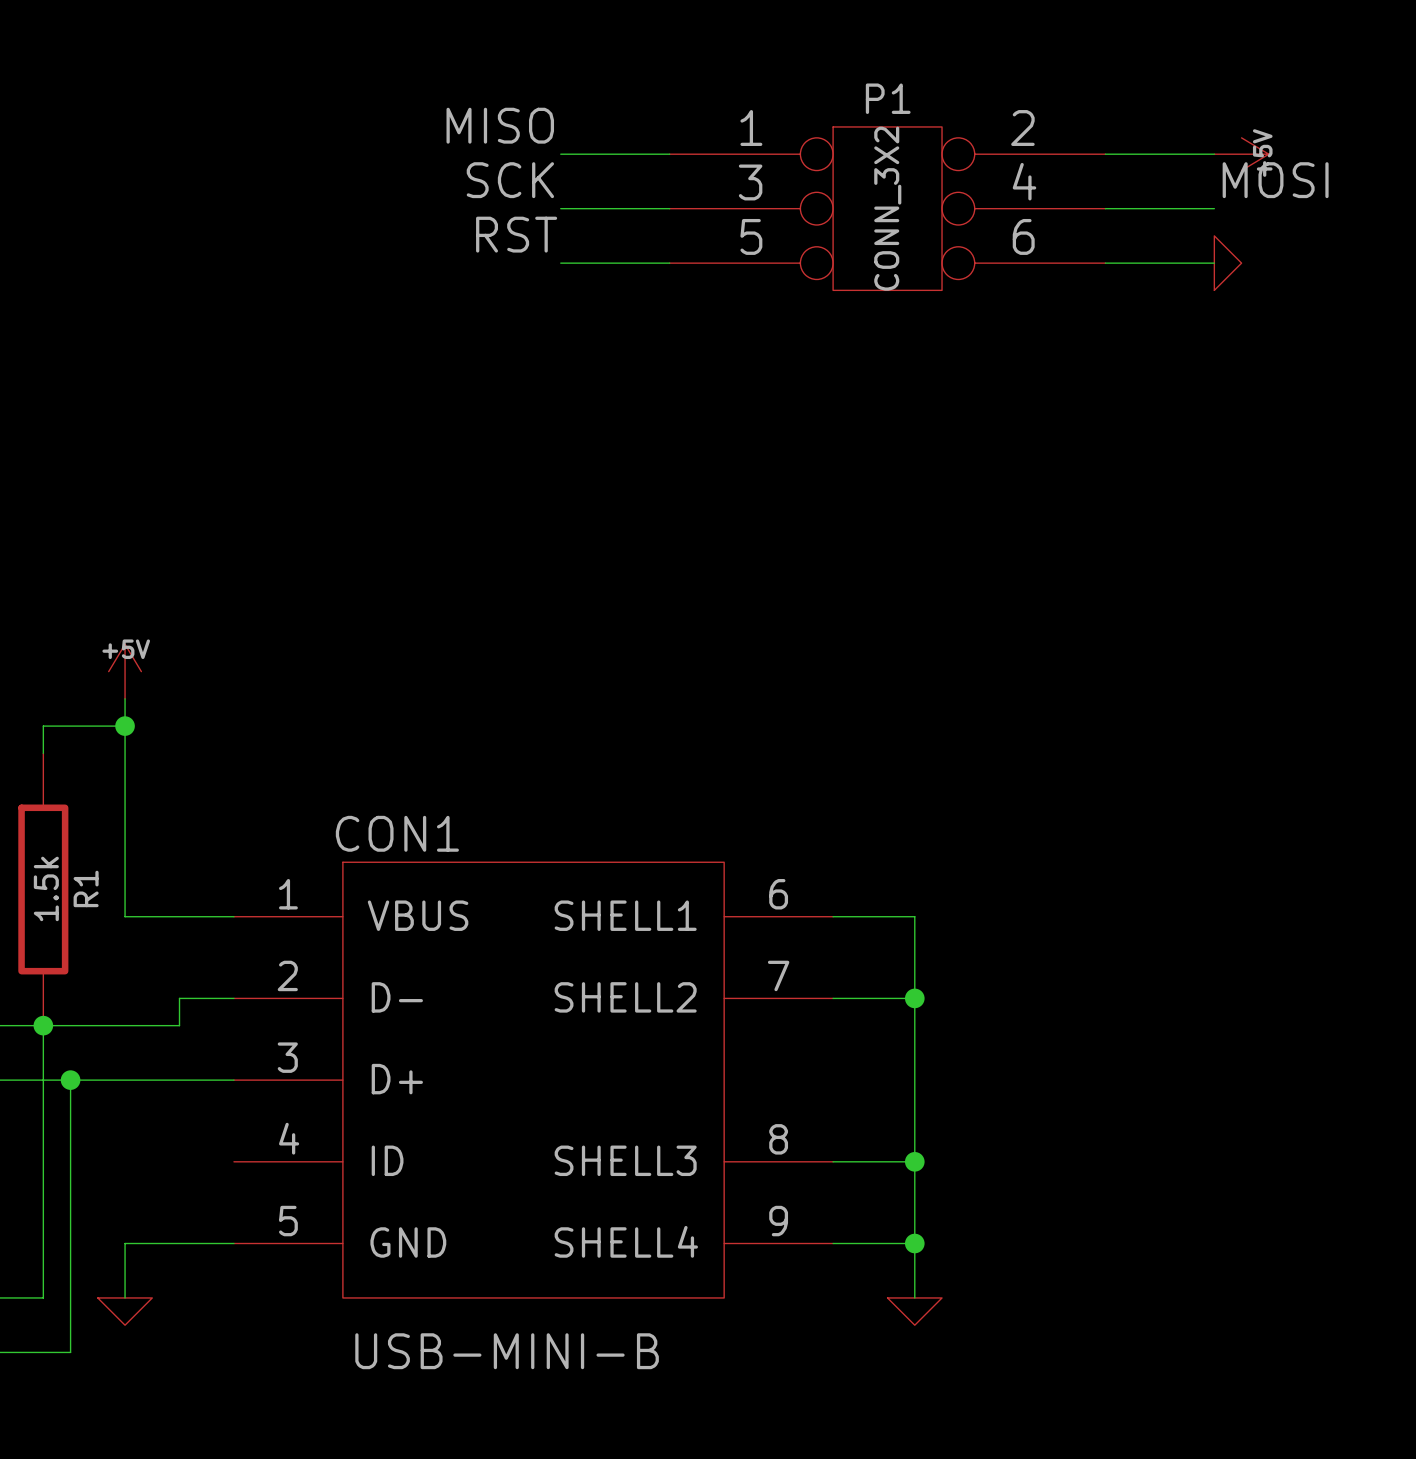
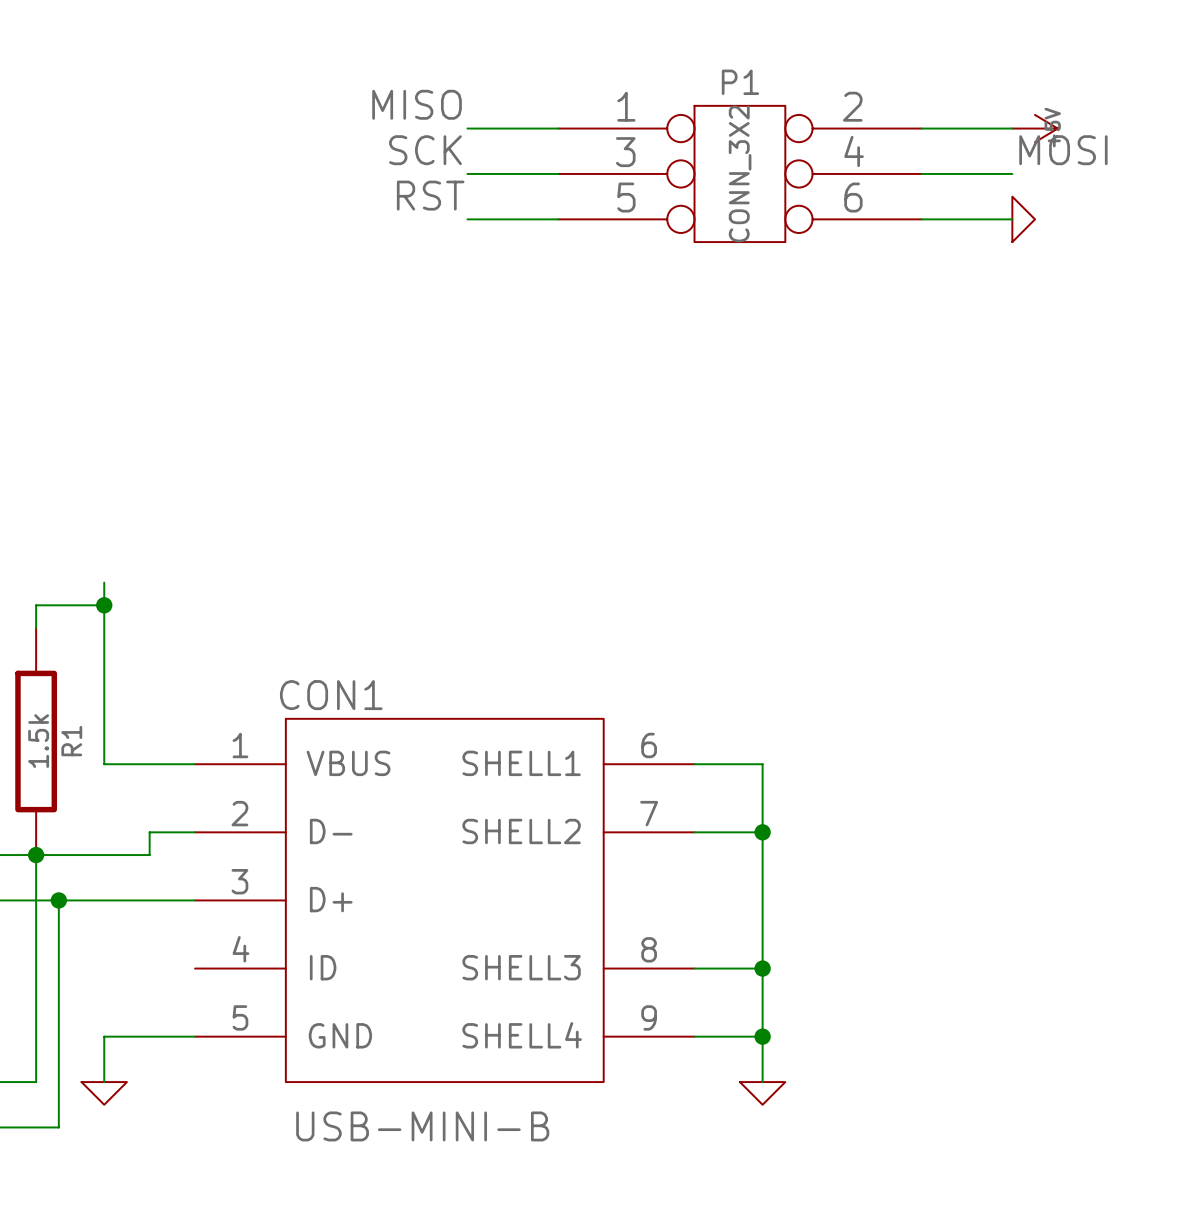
power symbol: +5V (125, 671) -> none

